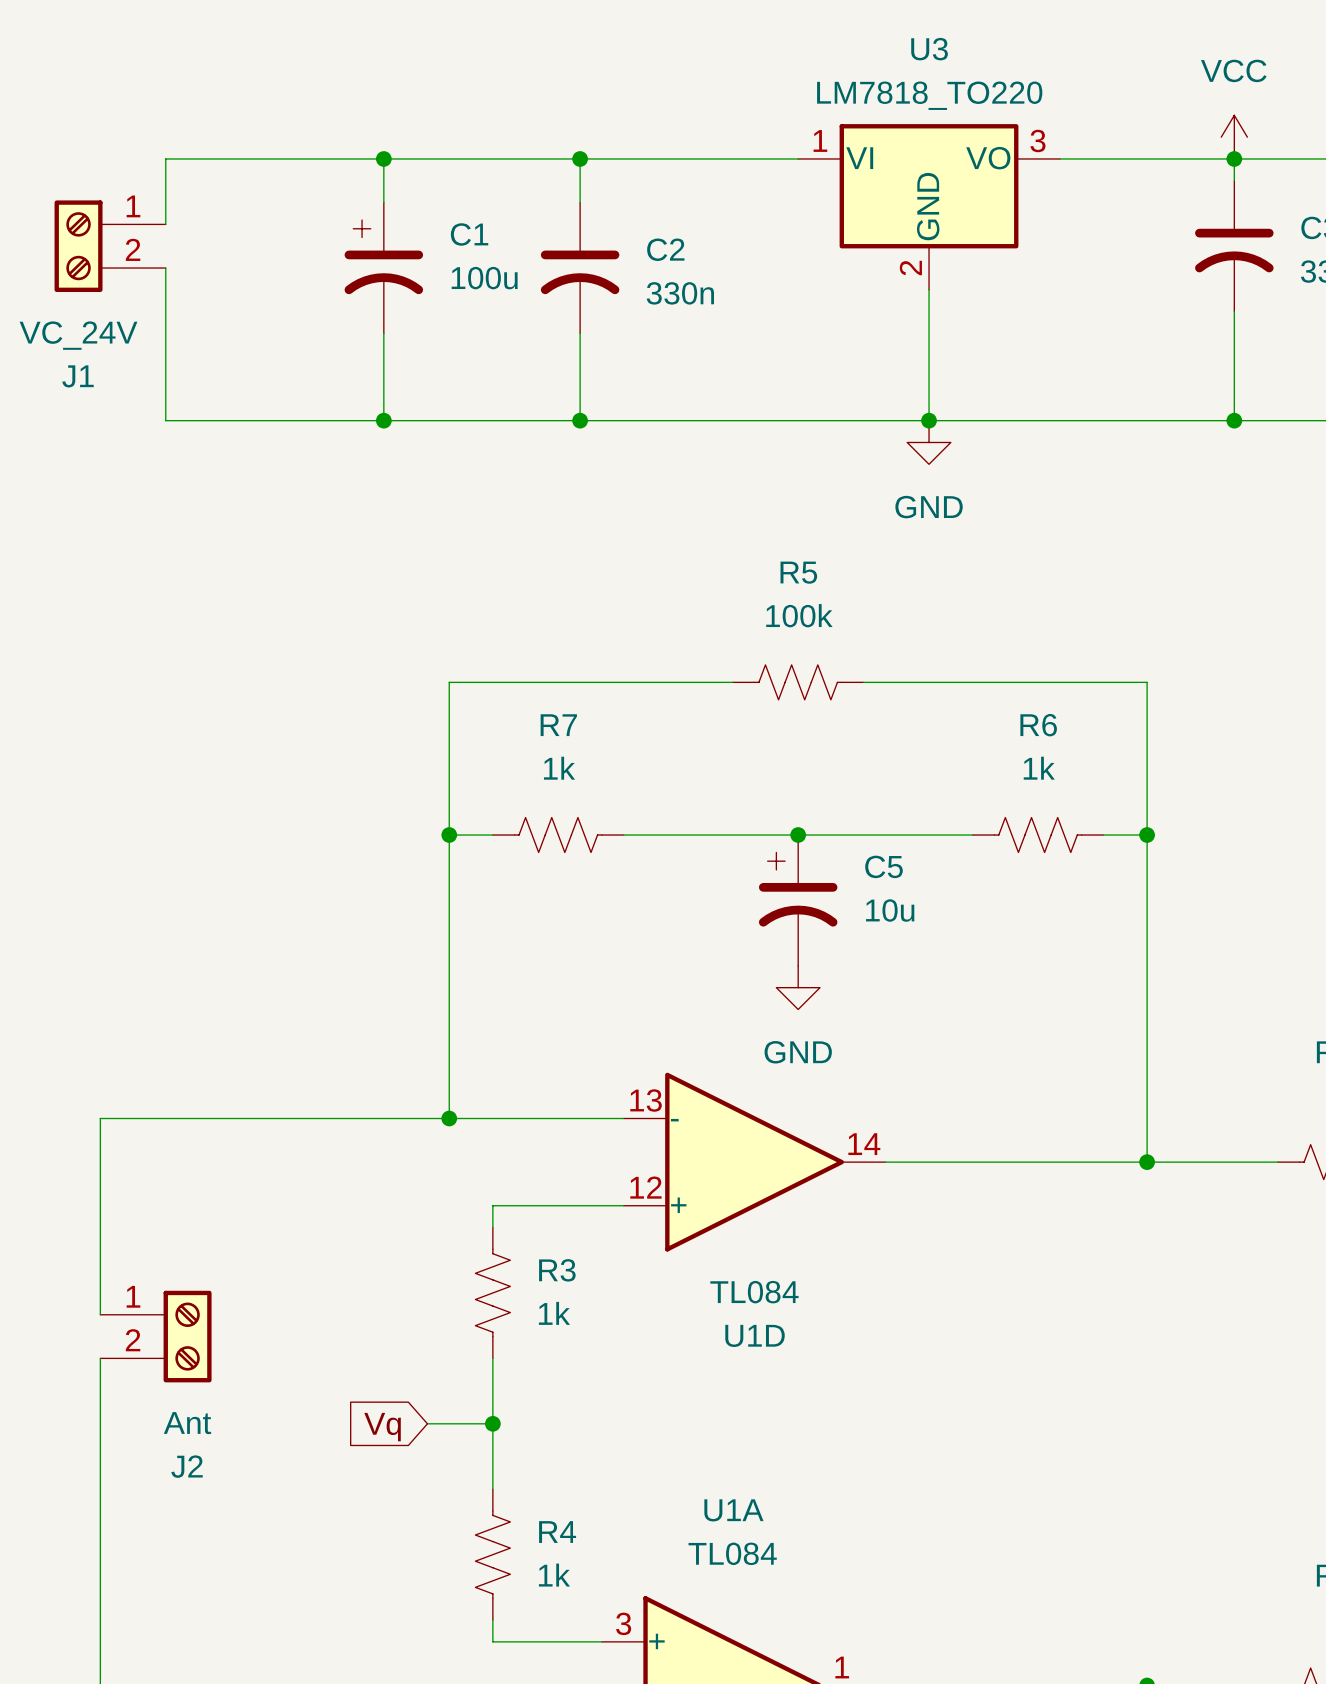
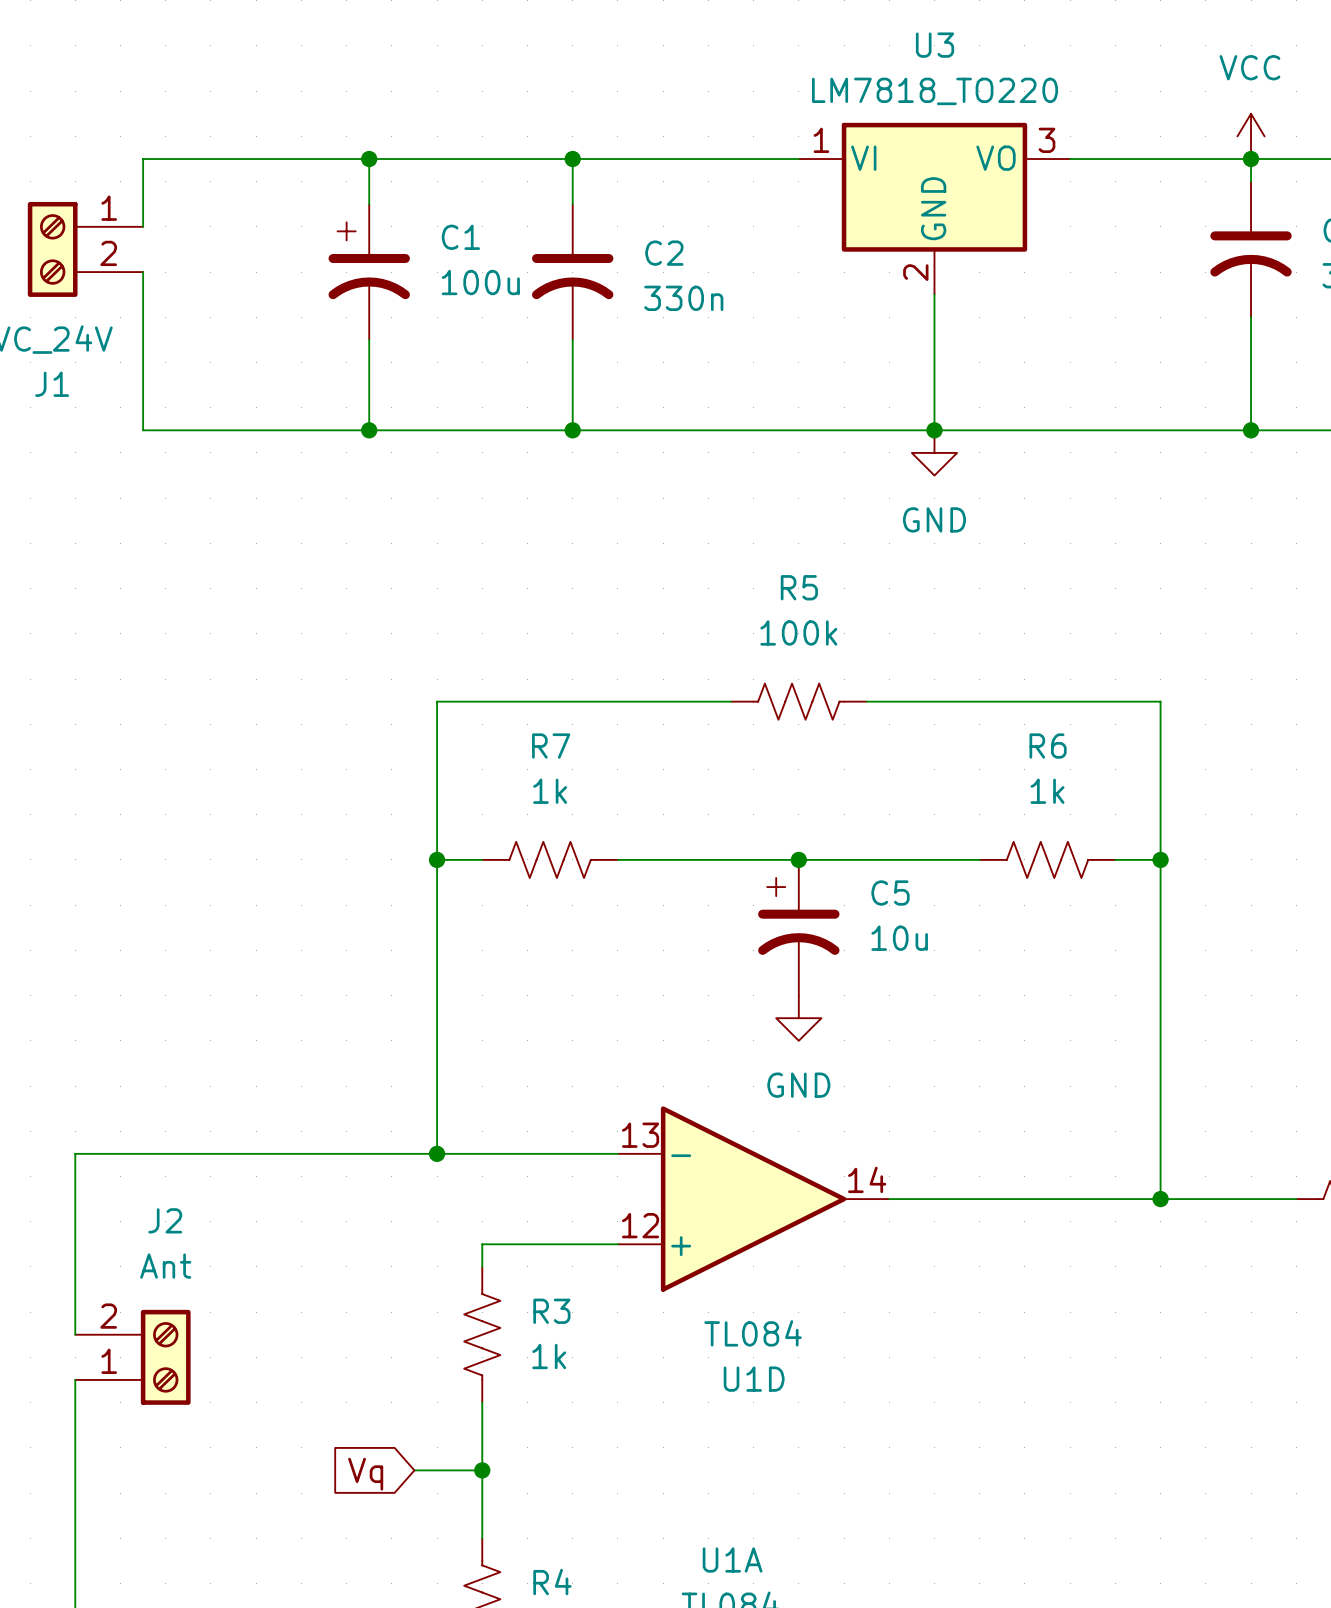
wire: (100, 1292) (100, 1314) -> (75, 1379) (75, 1402)
J2 flip: as is (187, 1336) -> up-down (165, 1357)

